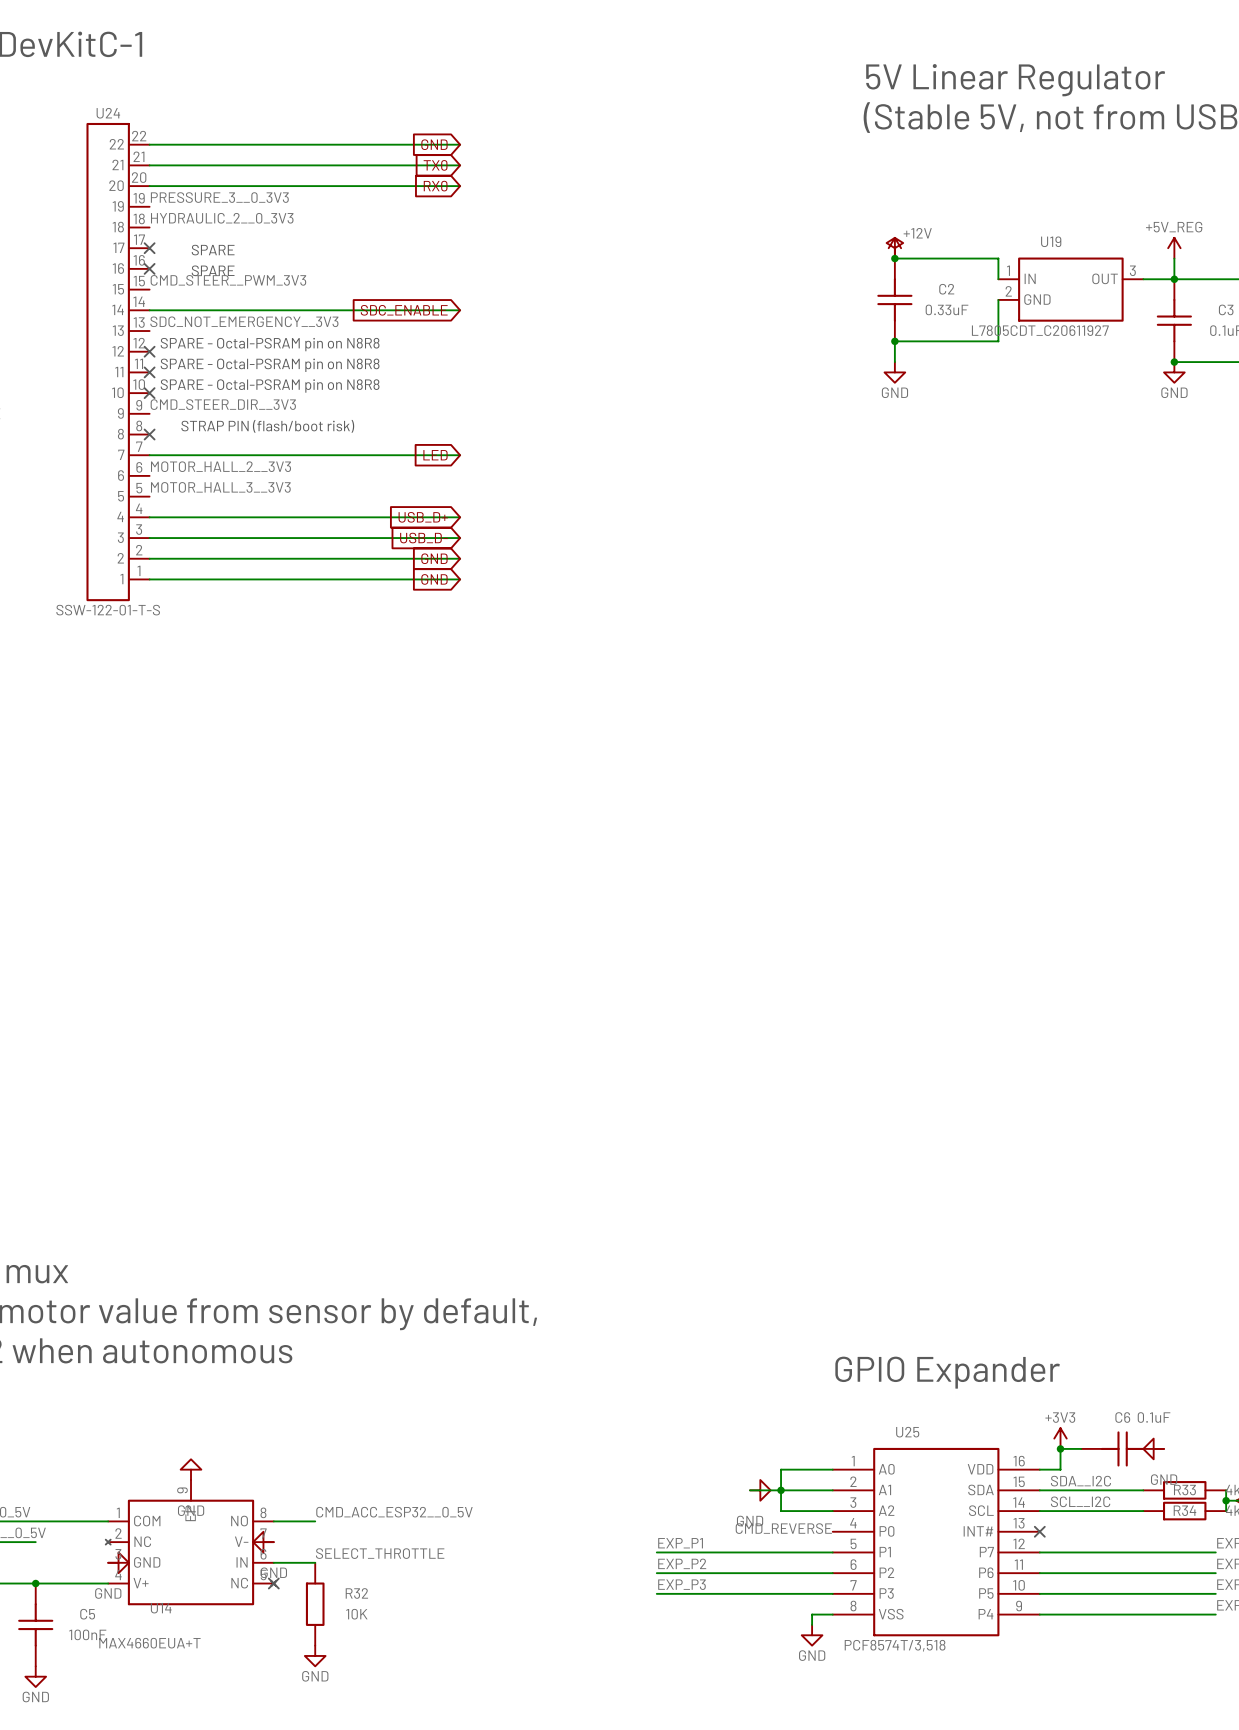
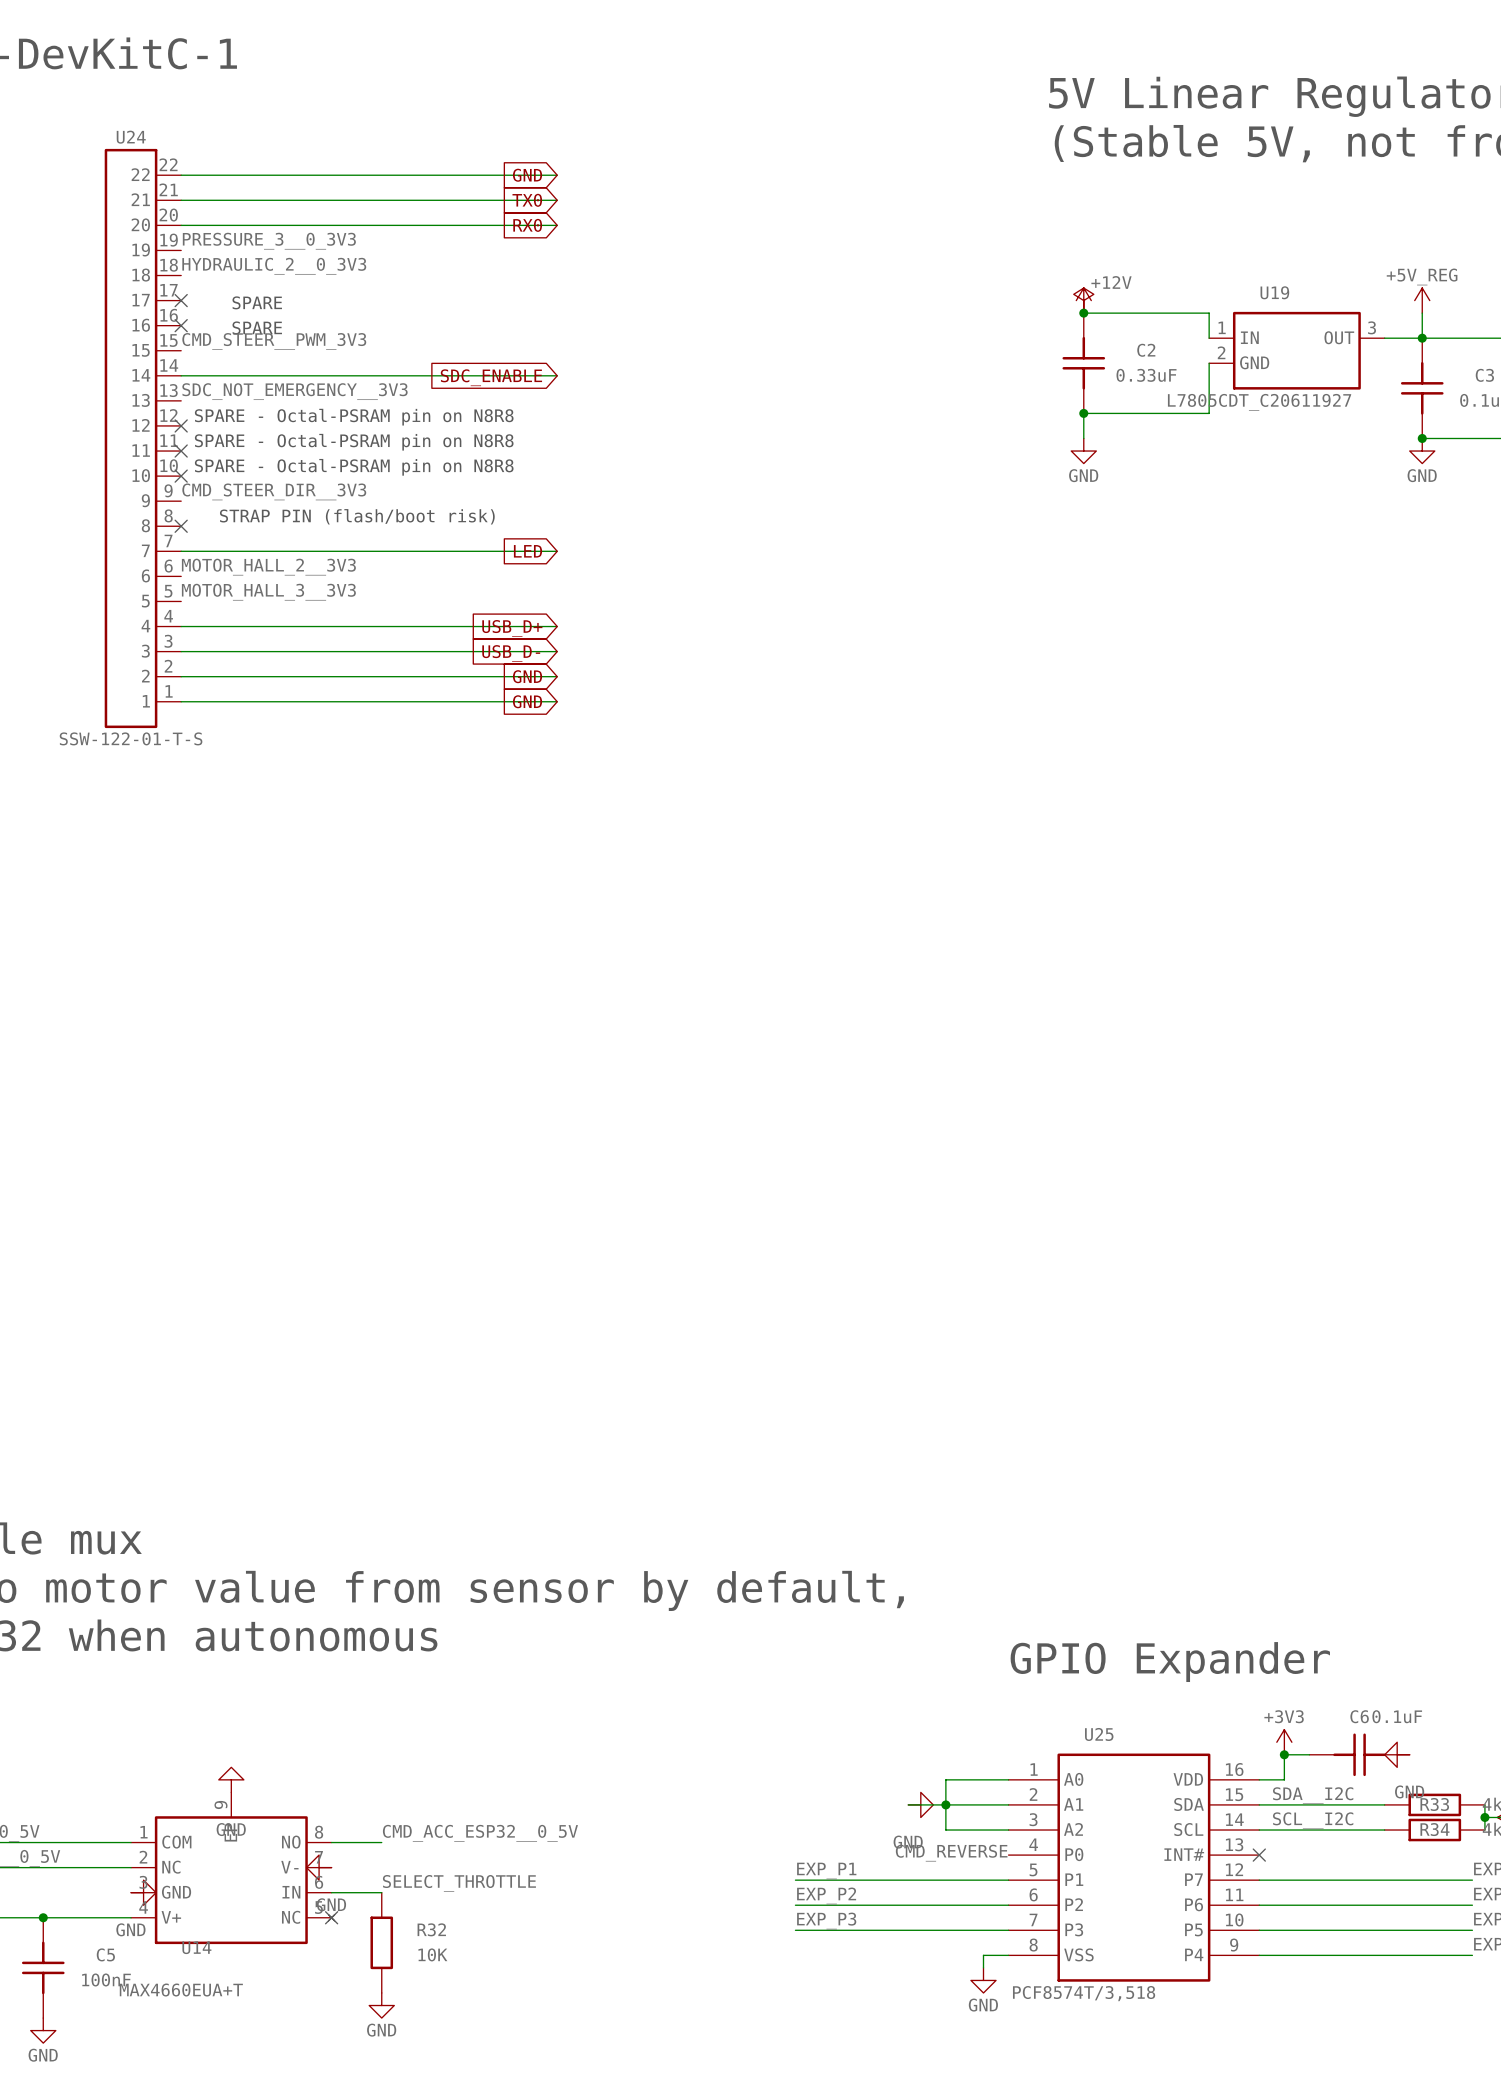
U14 symbol: [105, 1480, 277, 1606] -> [131, 1792, 335, 1945]
wire: none -> (43, 1867) (131, 1867)

